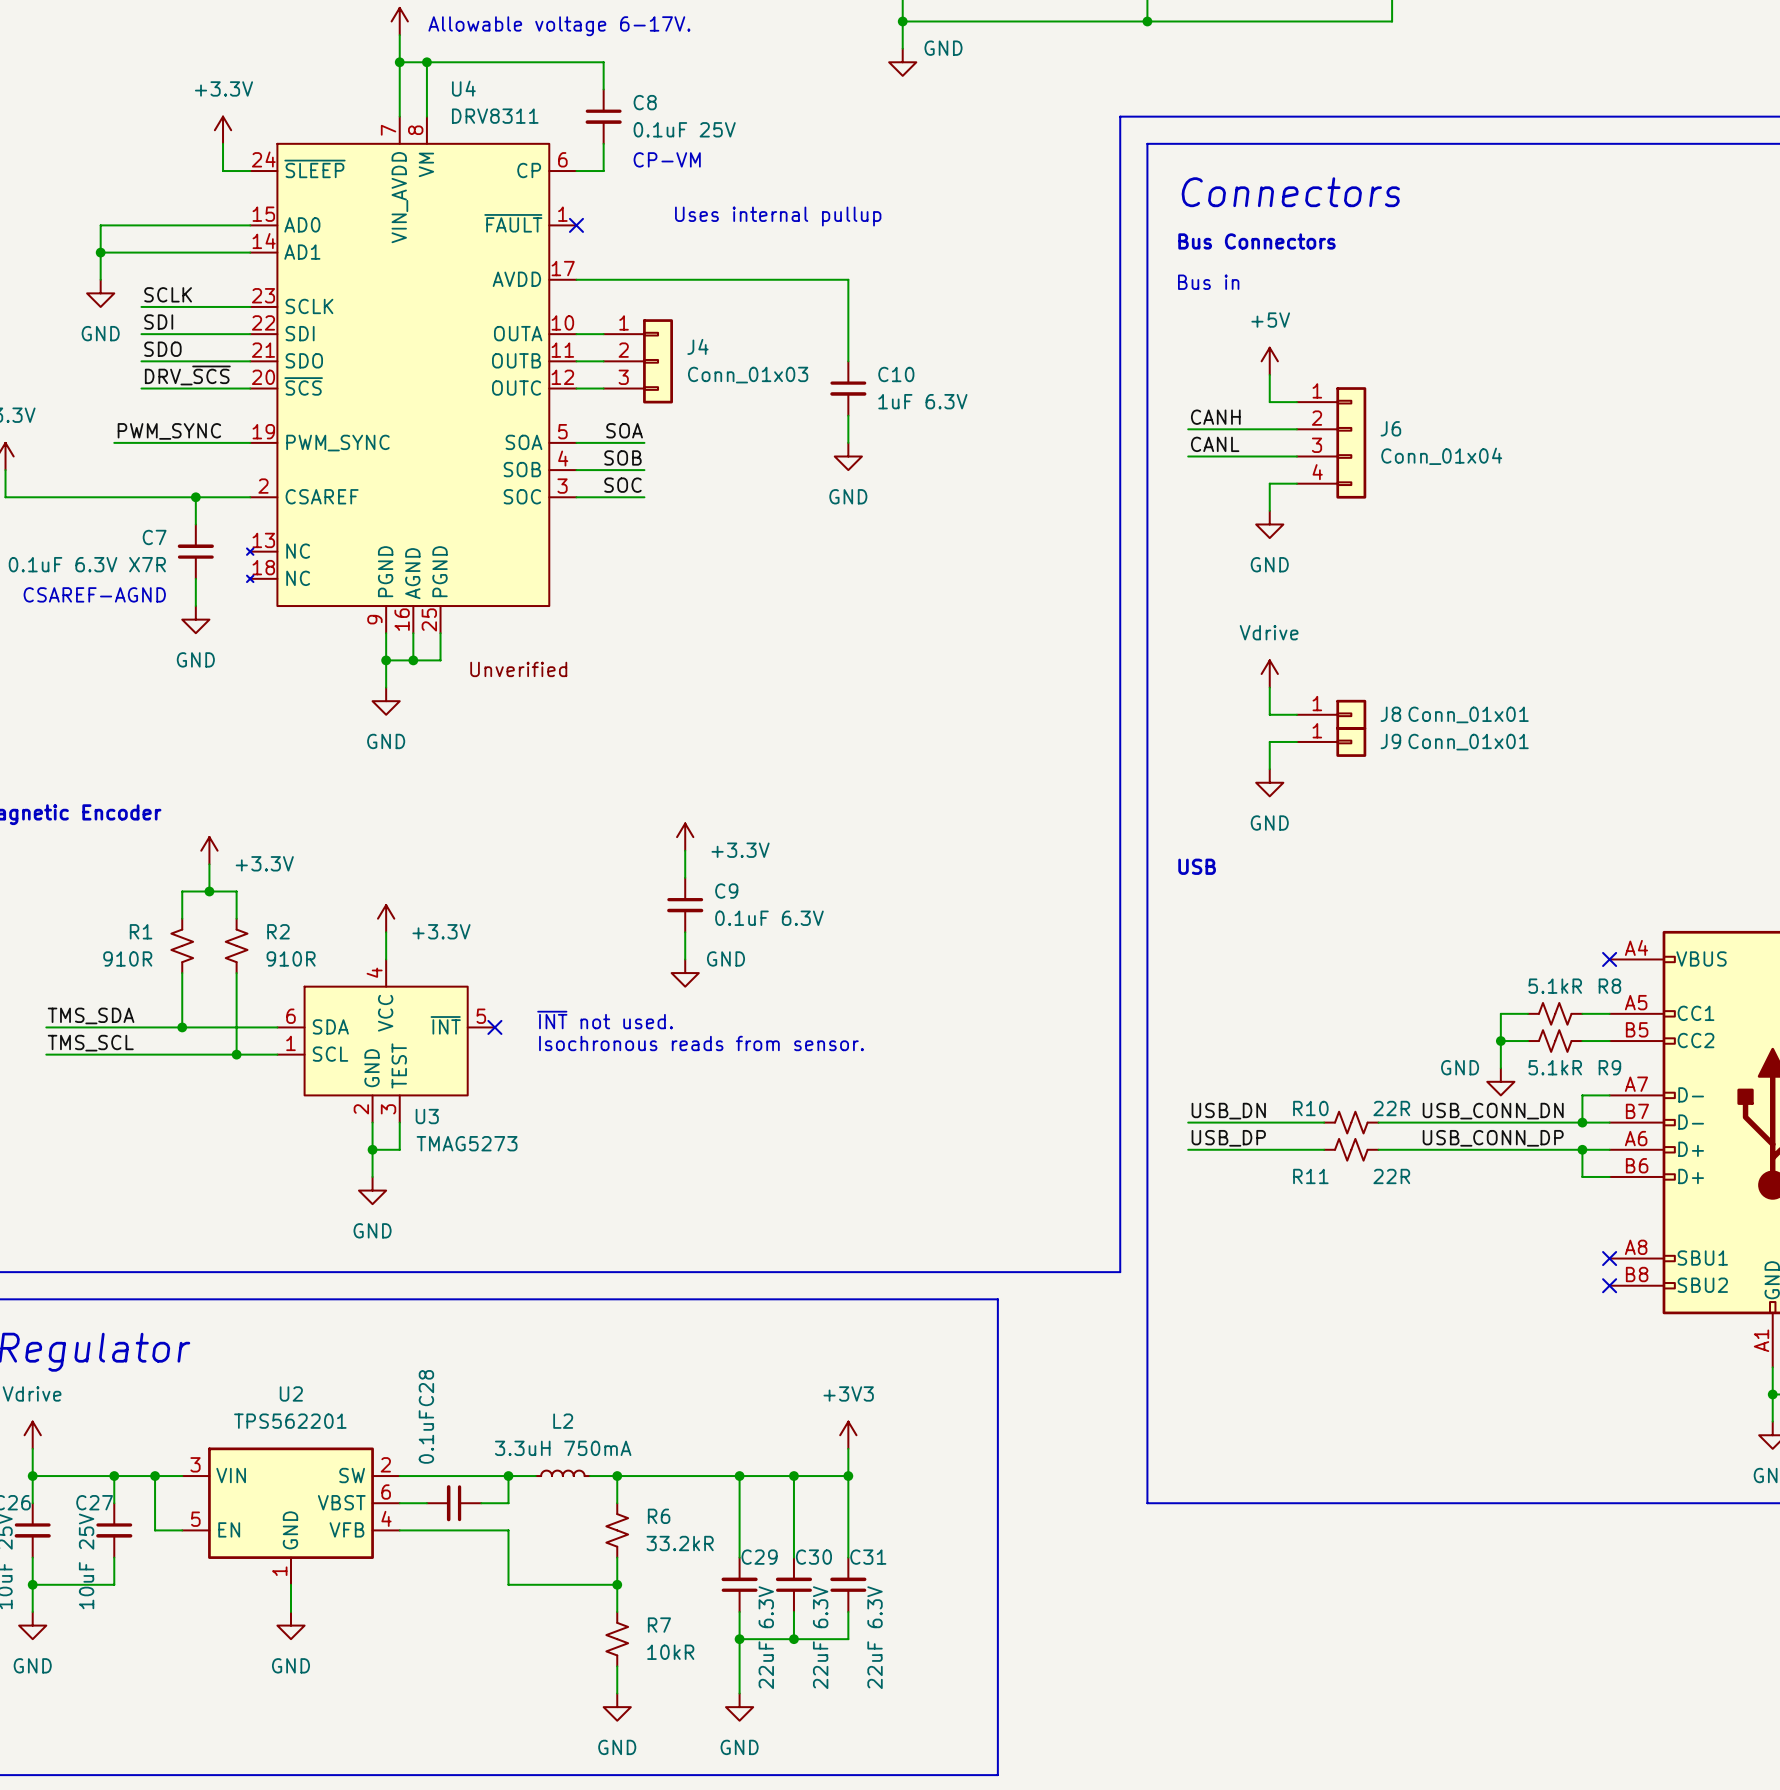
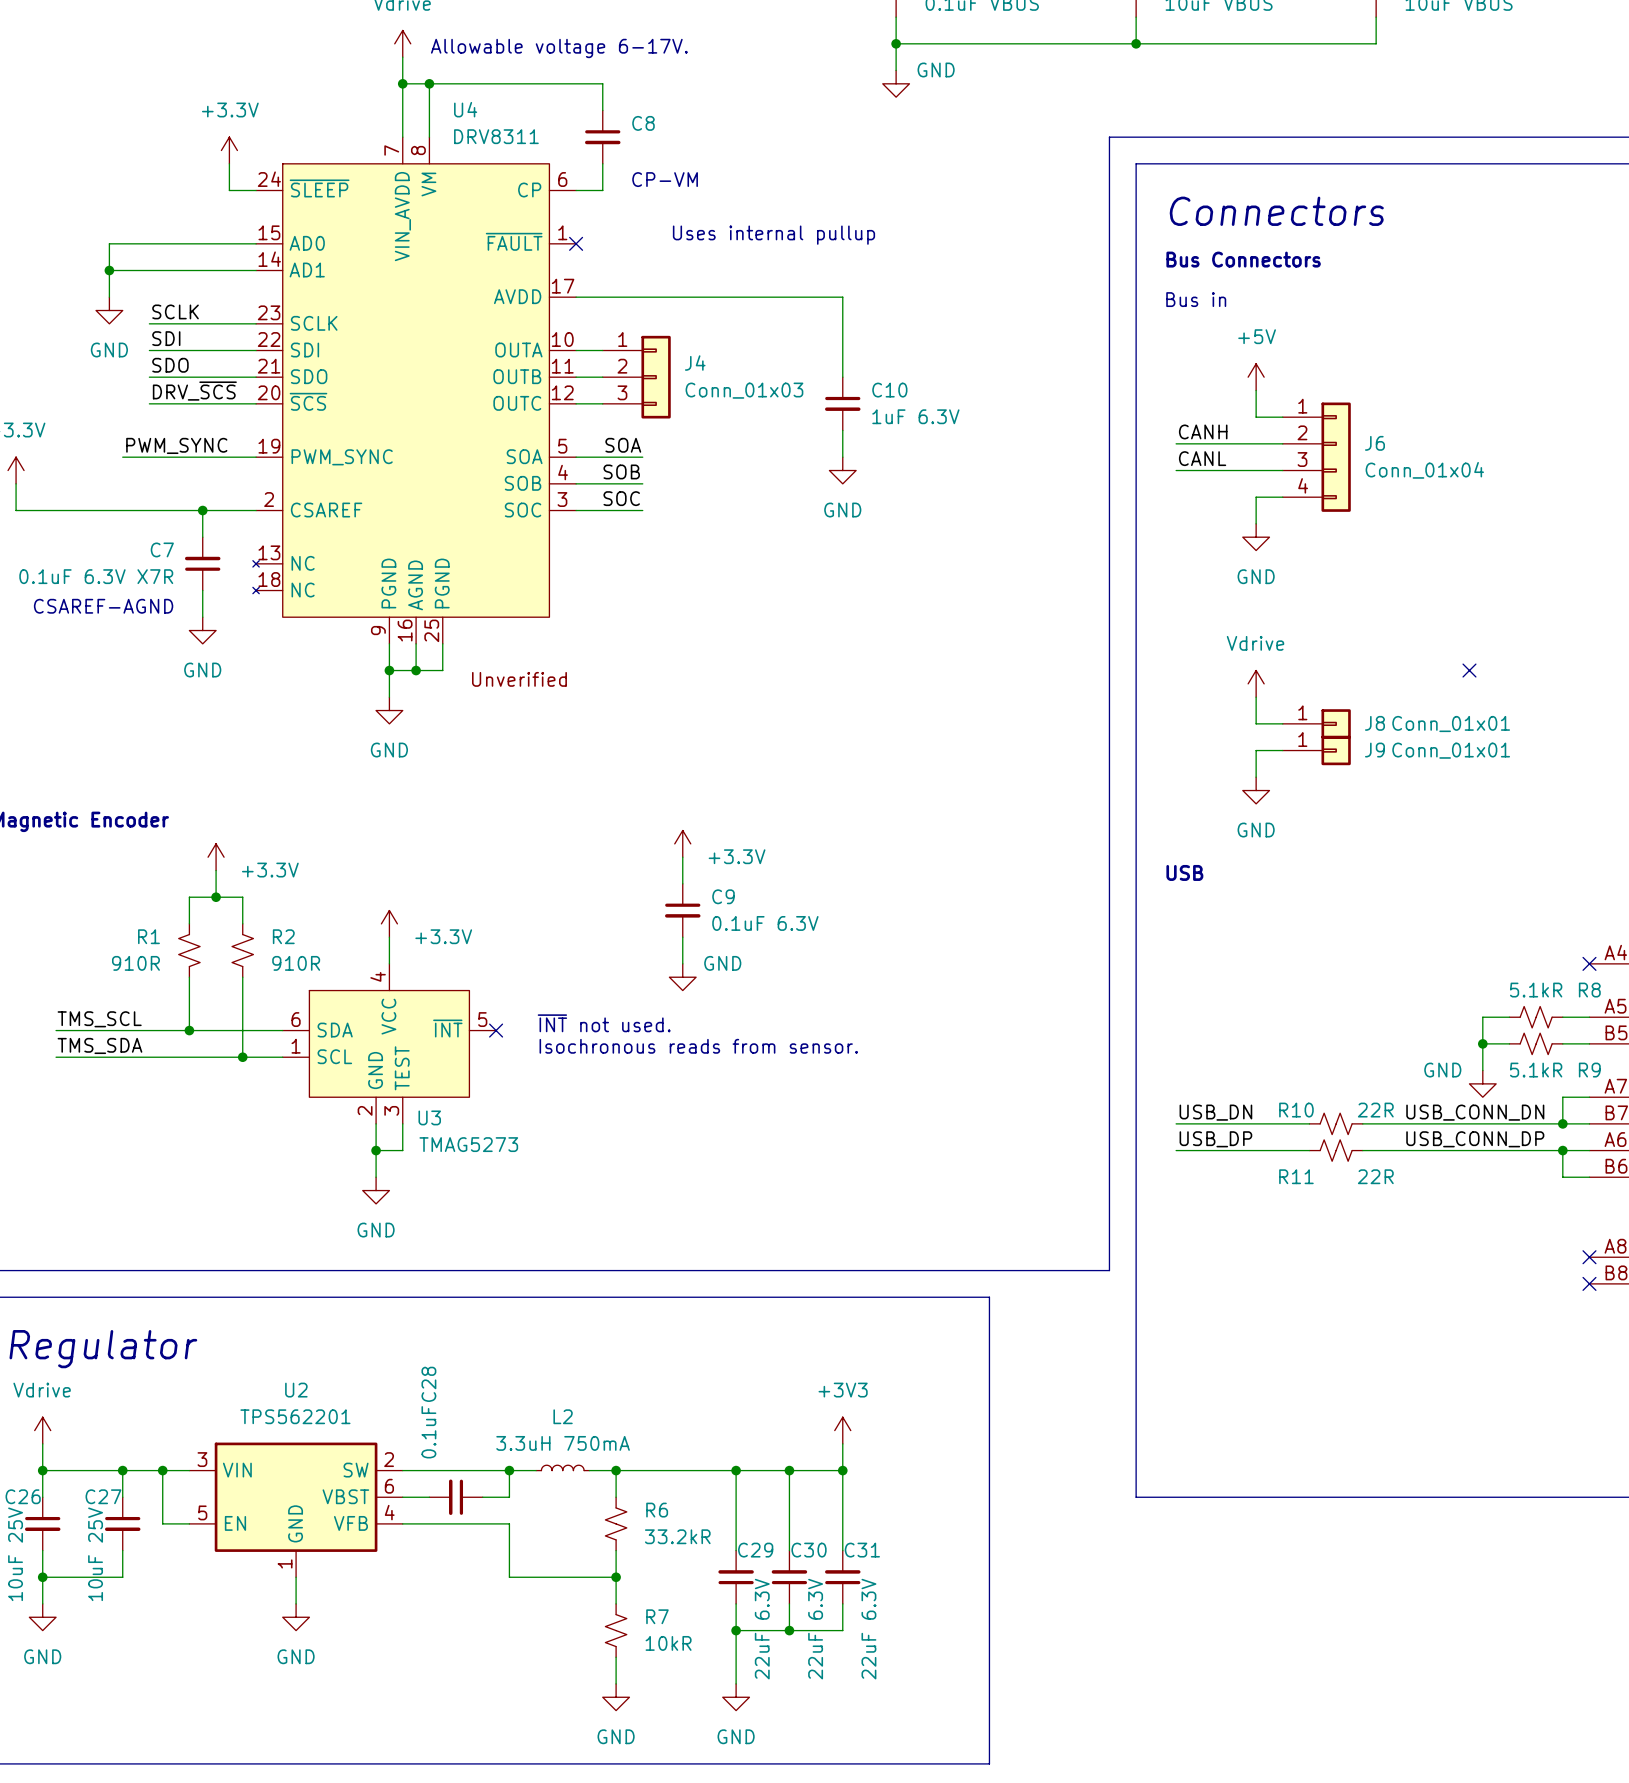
C8 value: 0.1uF 25V (684, 129) -> none
no-connect mark: none -> (1469, 670)
label: TMS_SDA (91, 1015) -> TMS_SCL (99, 1019)
label: TMS_SCL (90, 1043) -> TMS_SDA (99, 1045)

